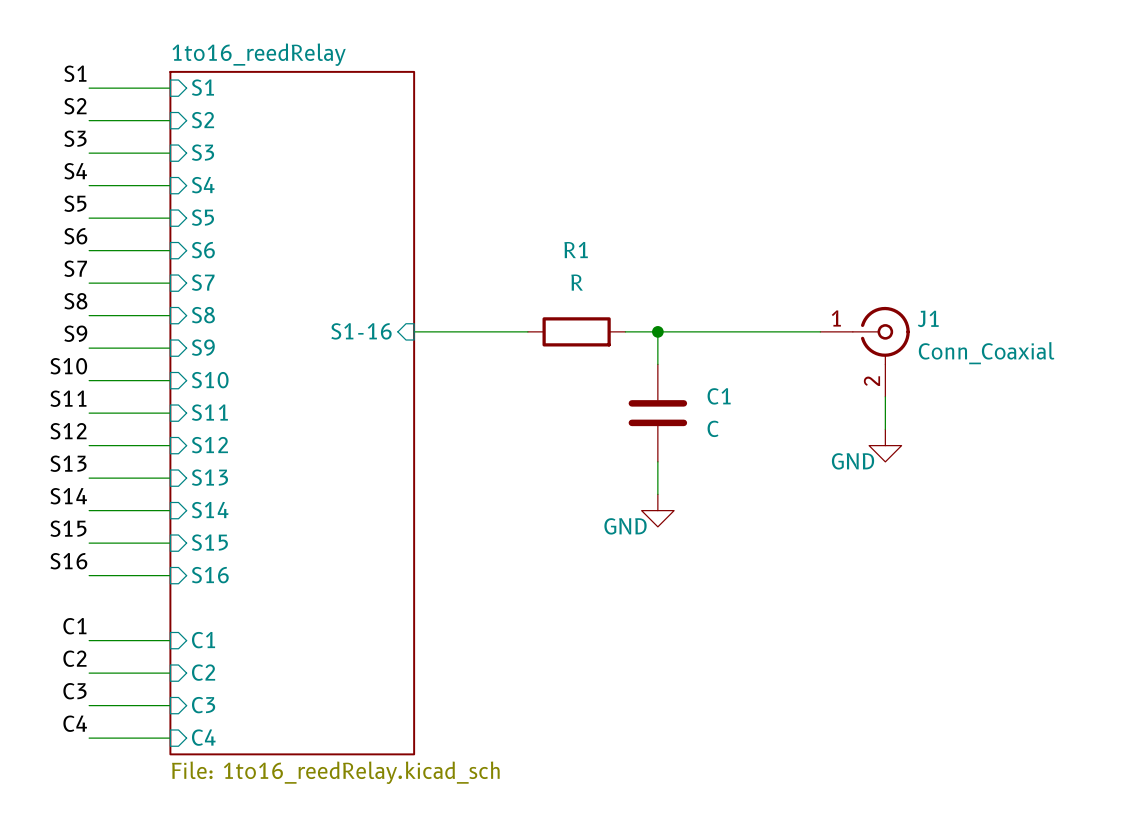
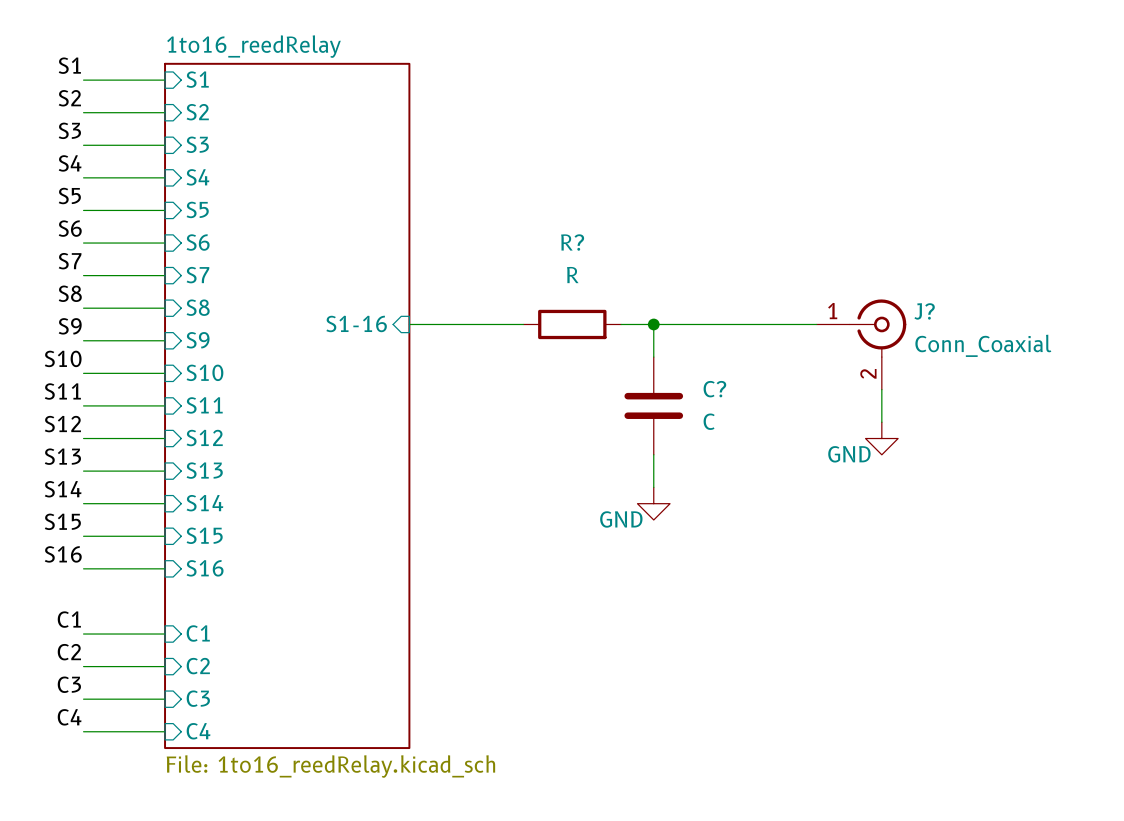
R1 name: R1 (576, 250) -> R? (572, 242)
J1 name: J1 (928, 318) -> J? (924, 311)
C1 name: C1 (719, 396) -> C? (714, 389)

